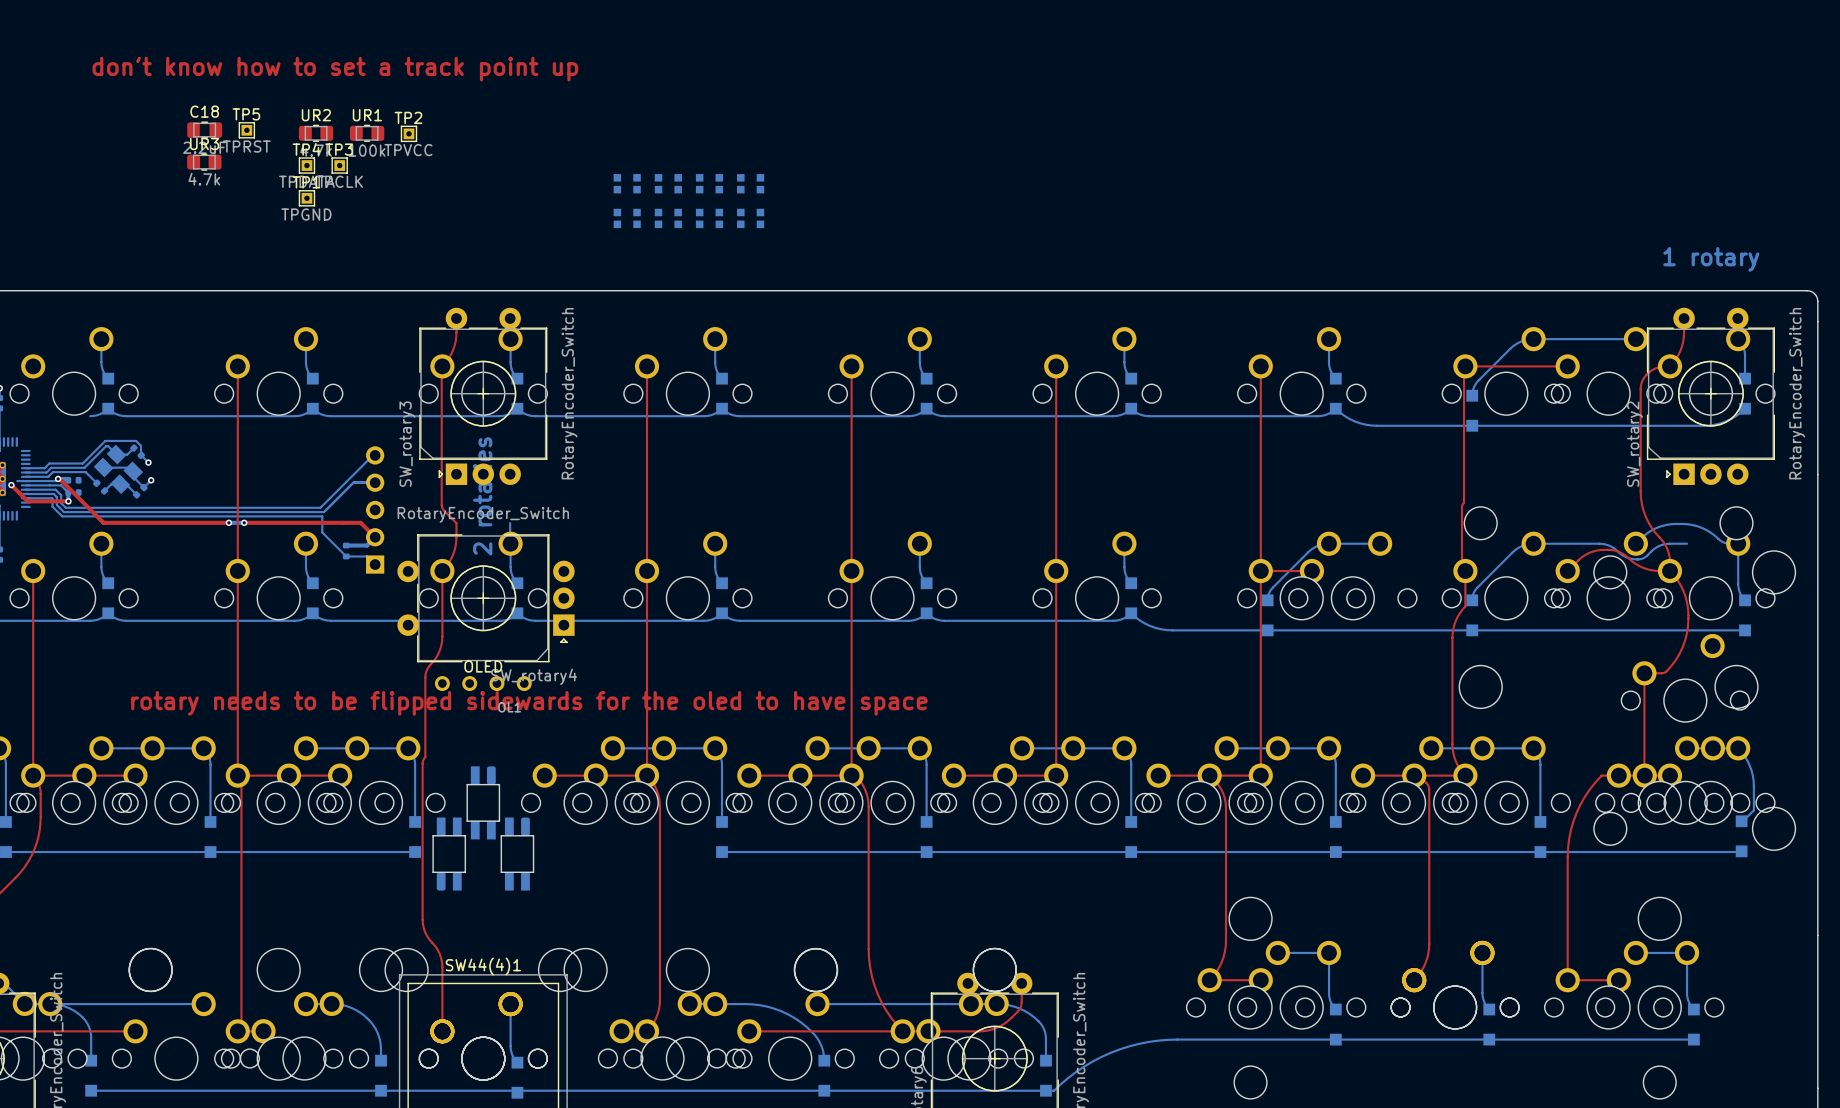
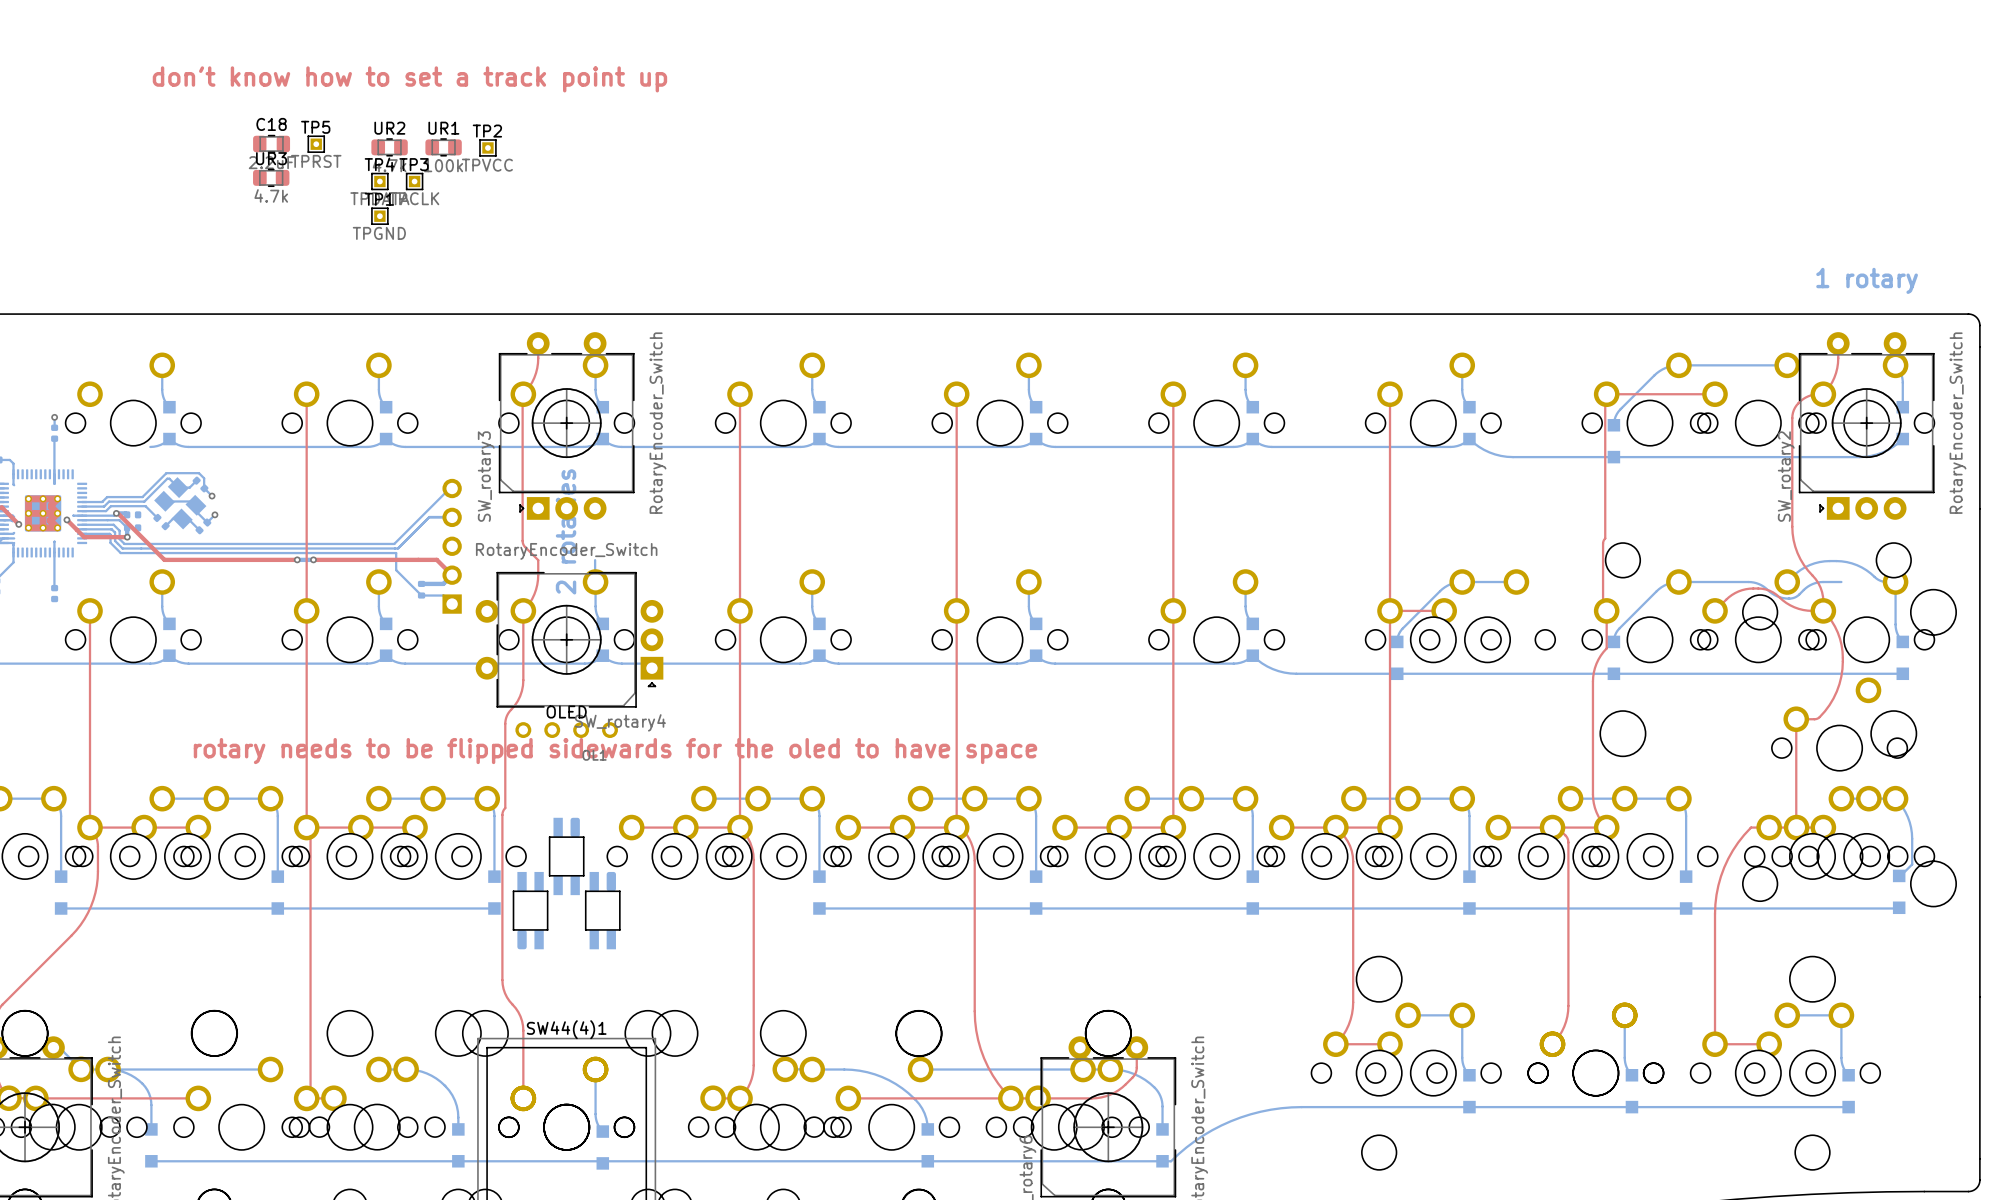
part: (627, 183) -> none
part: (668, 183) -> none
part: (709, 183) -> none
part: (750, 183) -> none
part: (627, 218) -> none
part: (668, 218) -> none
part: (709, 218) -> none
part: (750, 218) -> none

